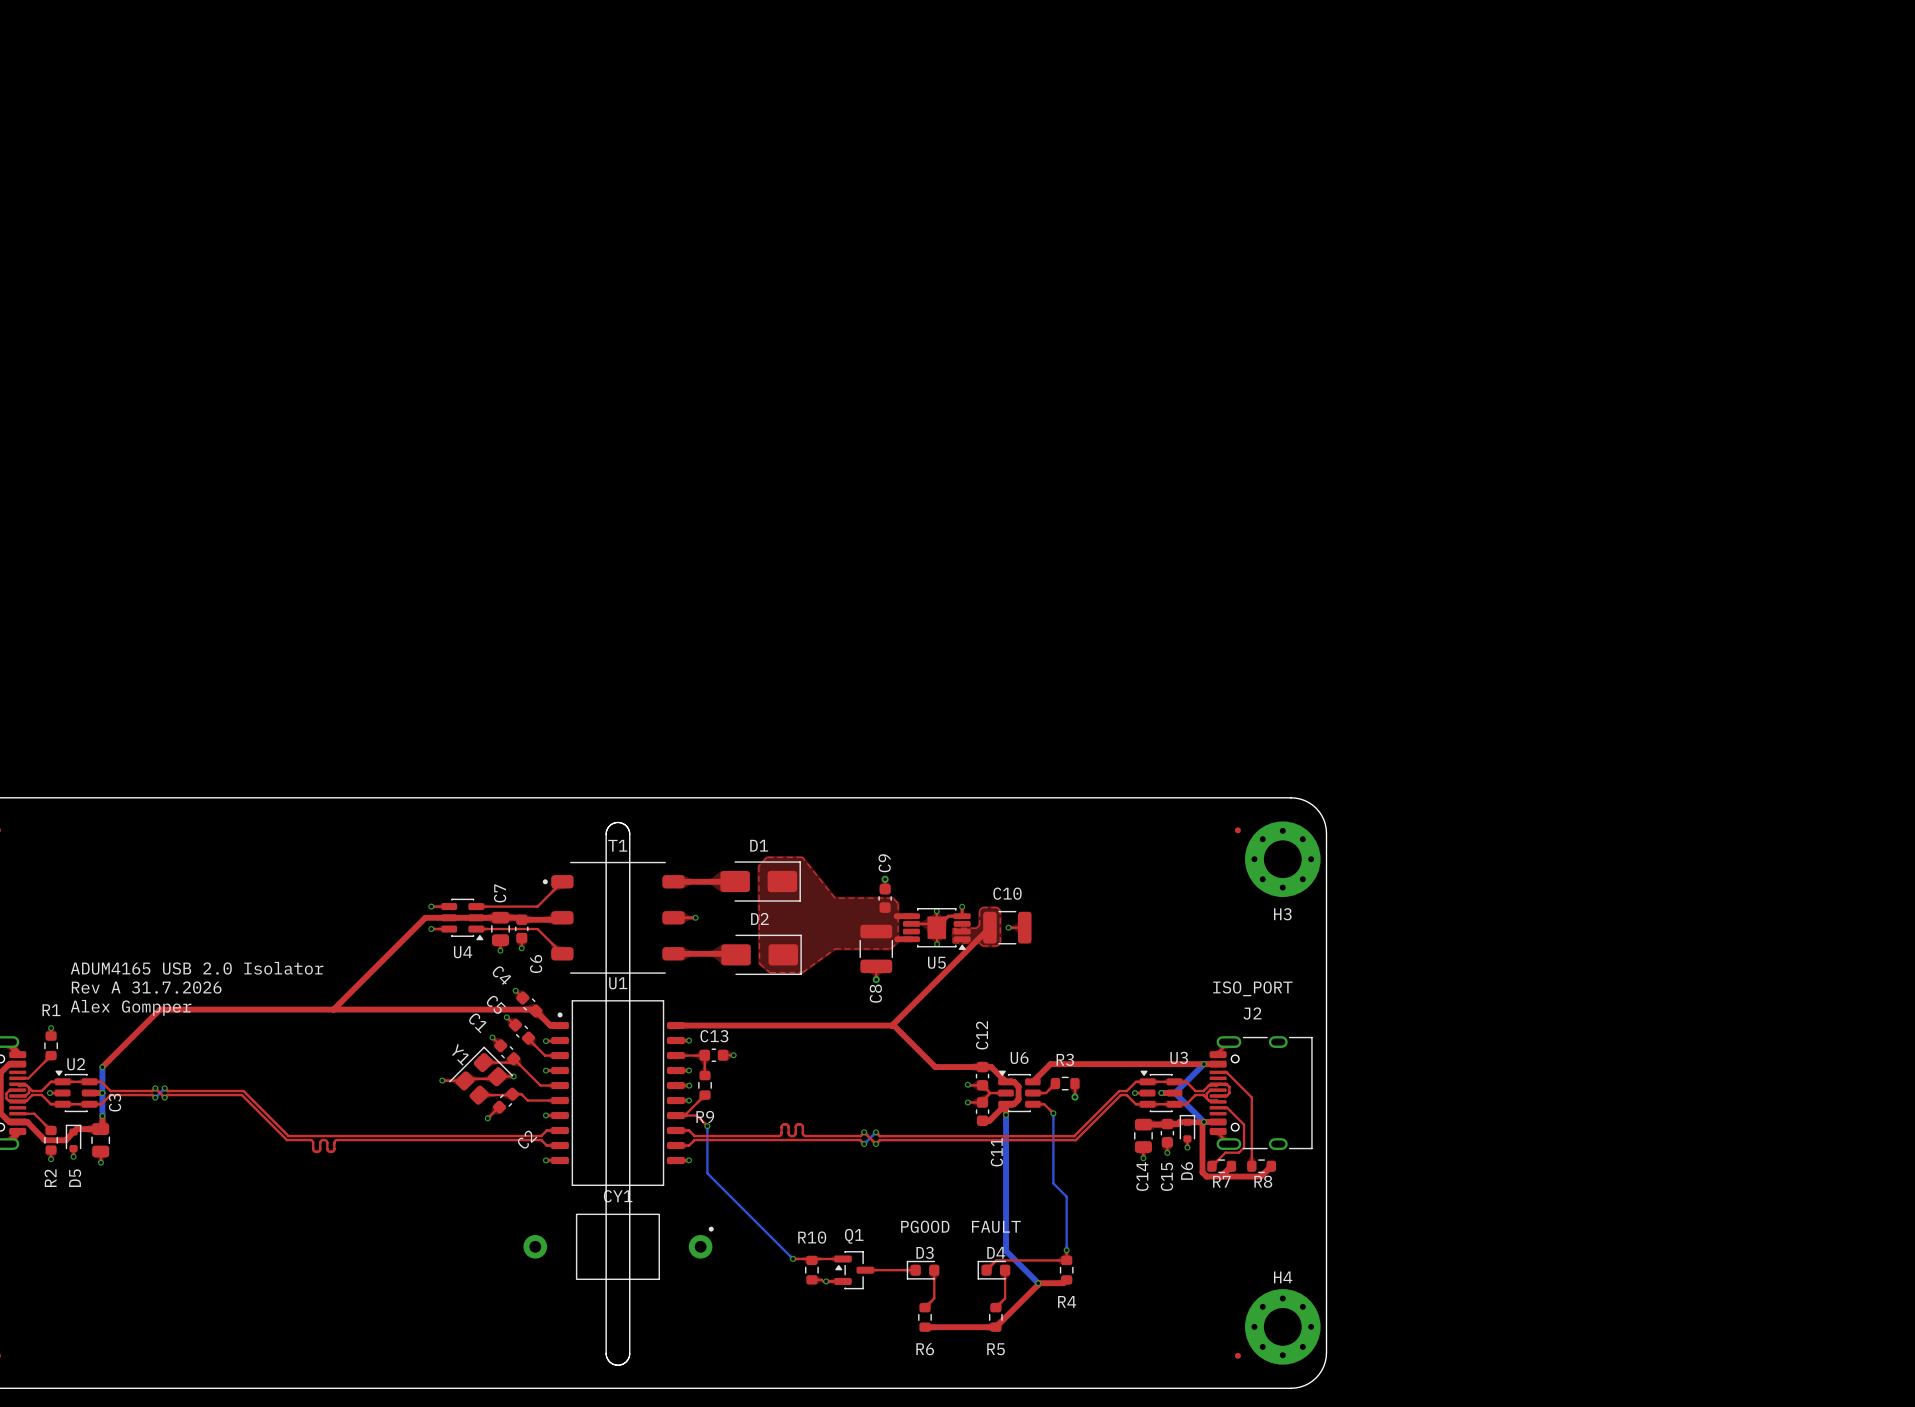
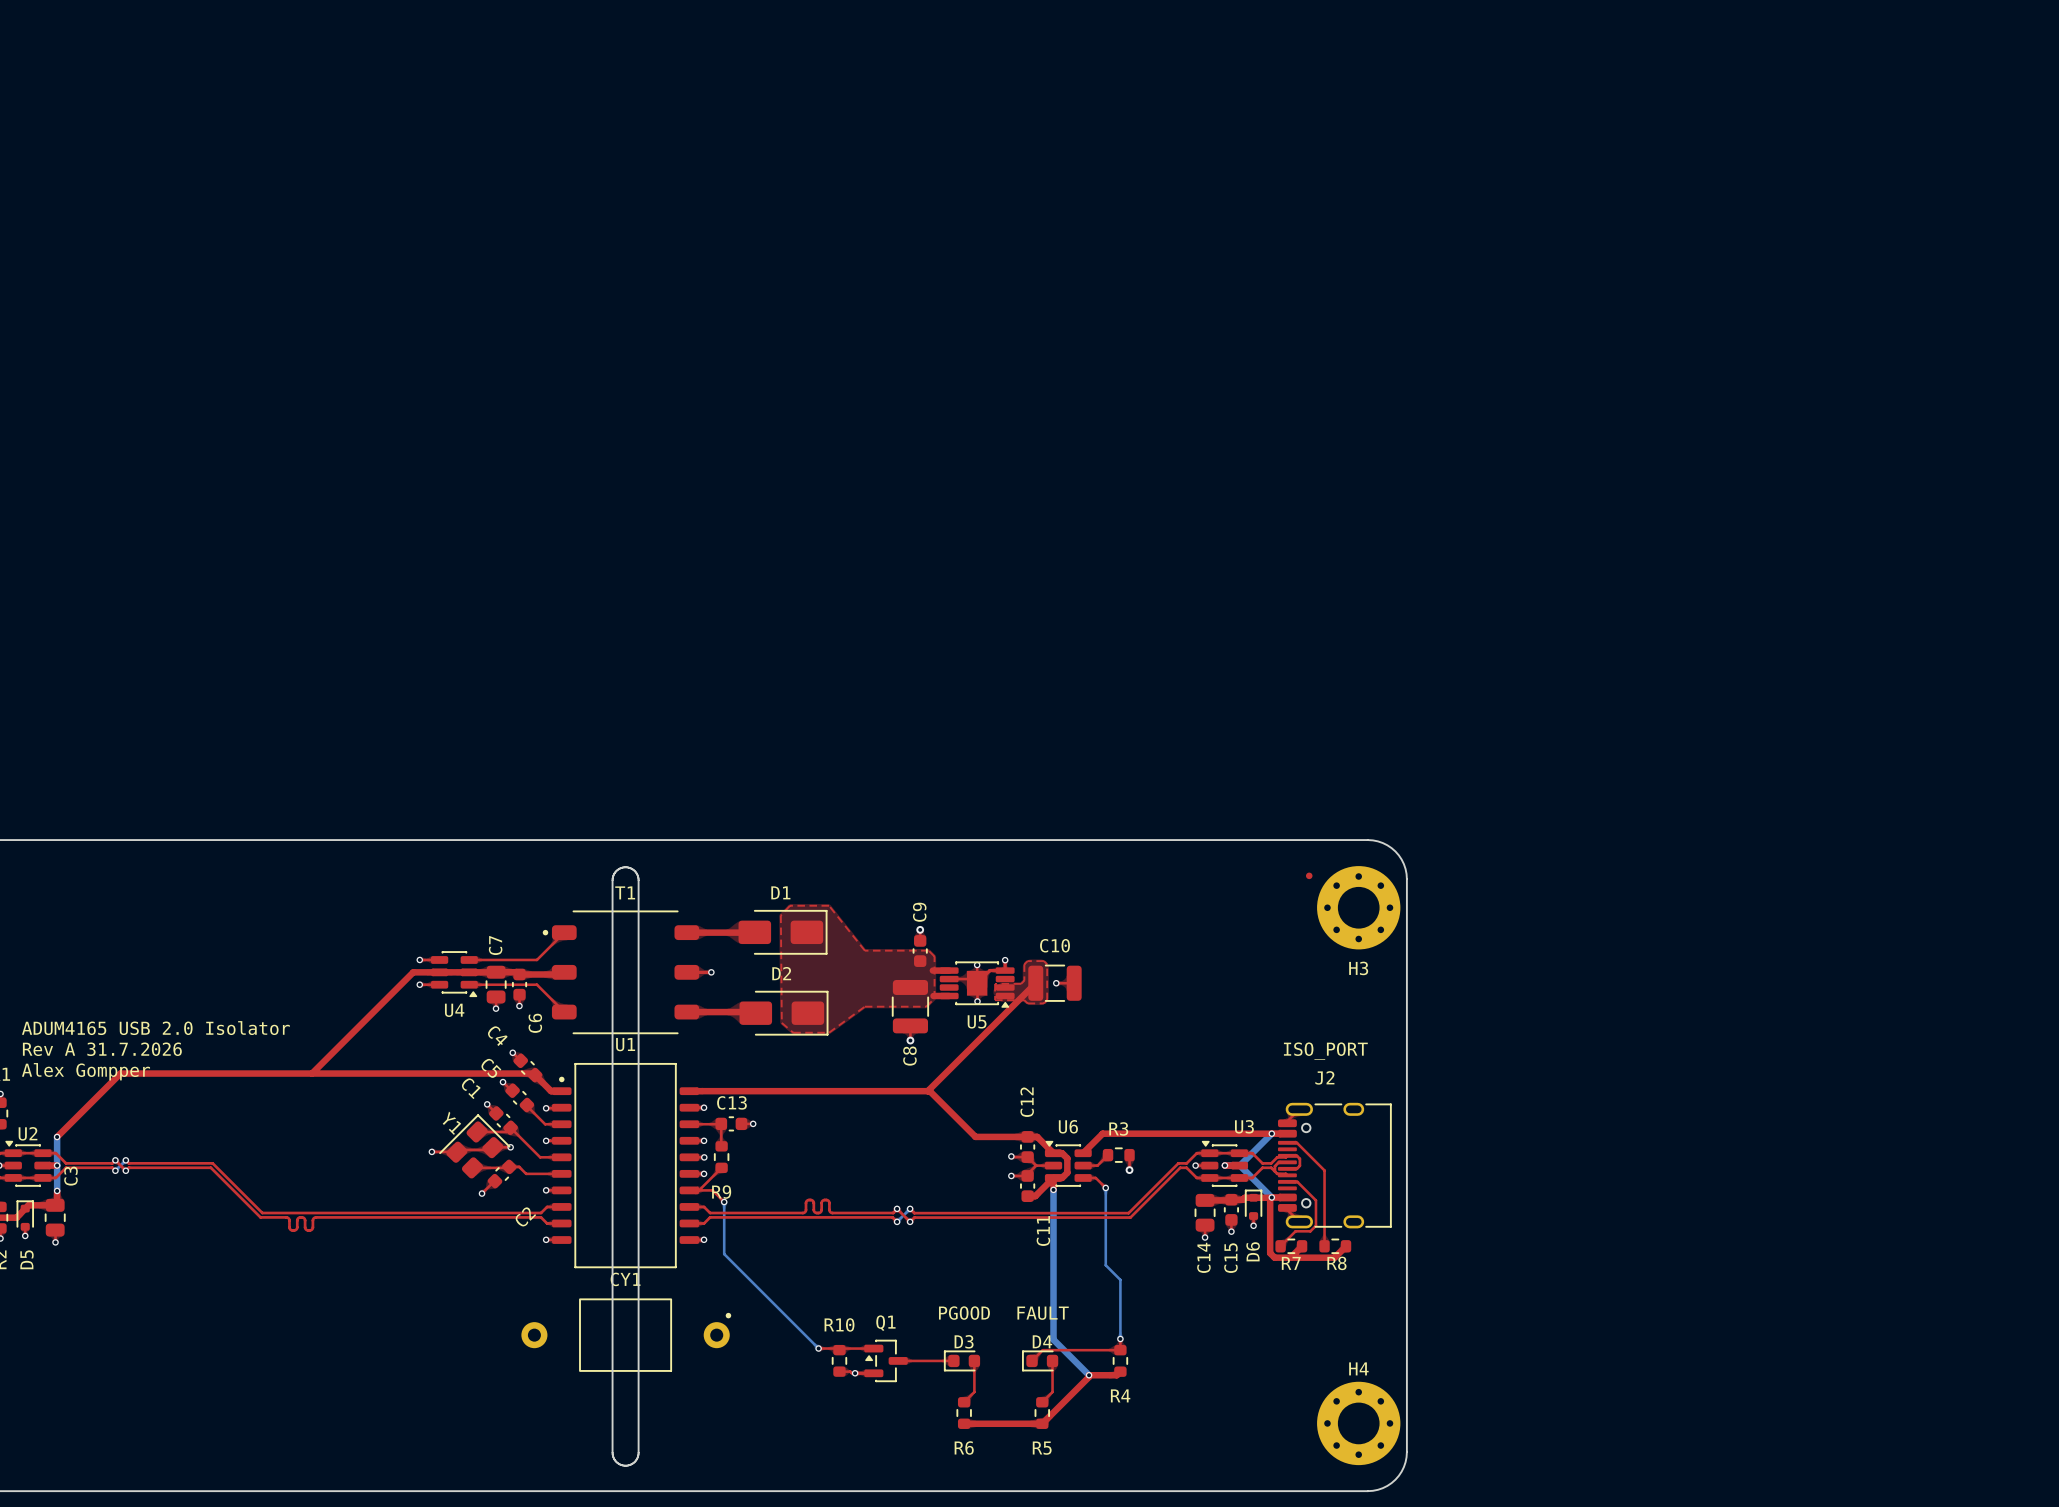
part: (1237, 1355) -> none

